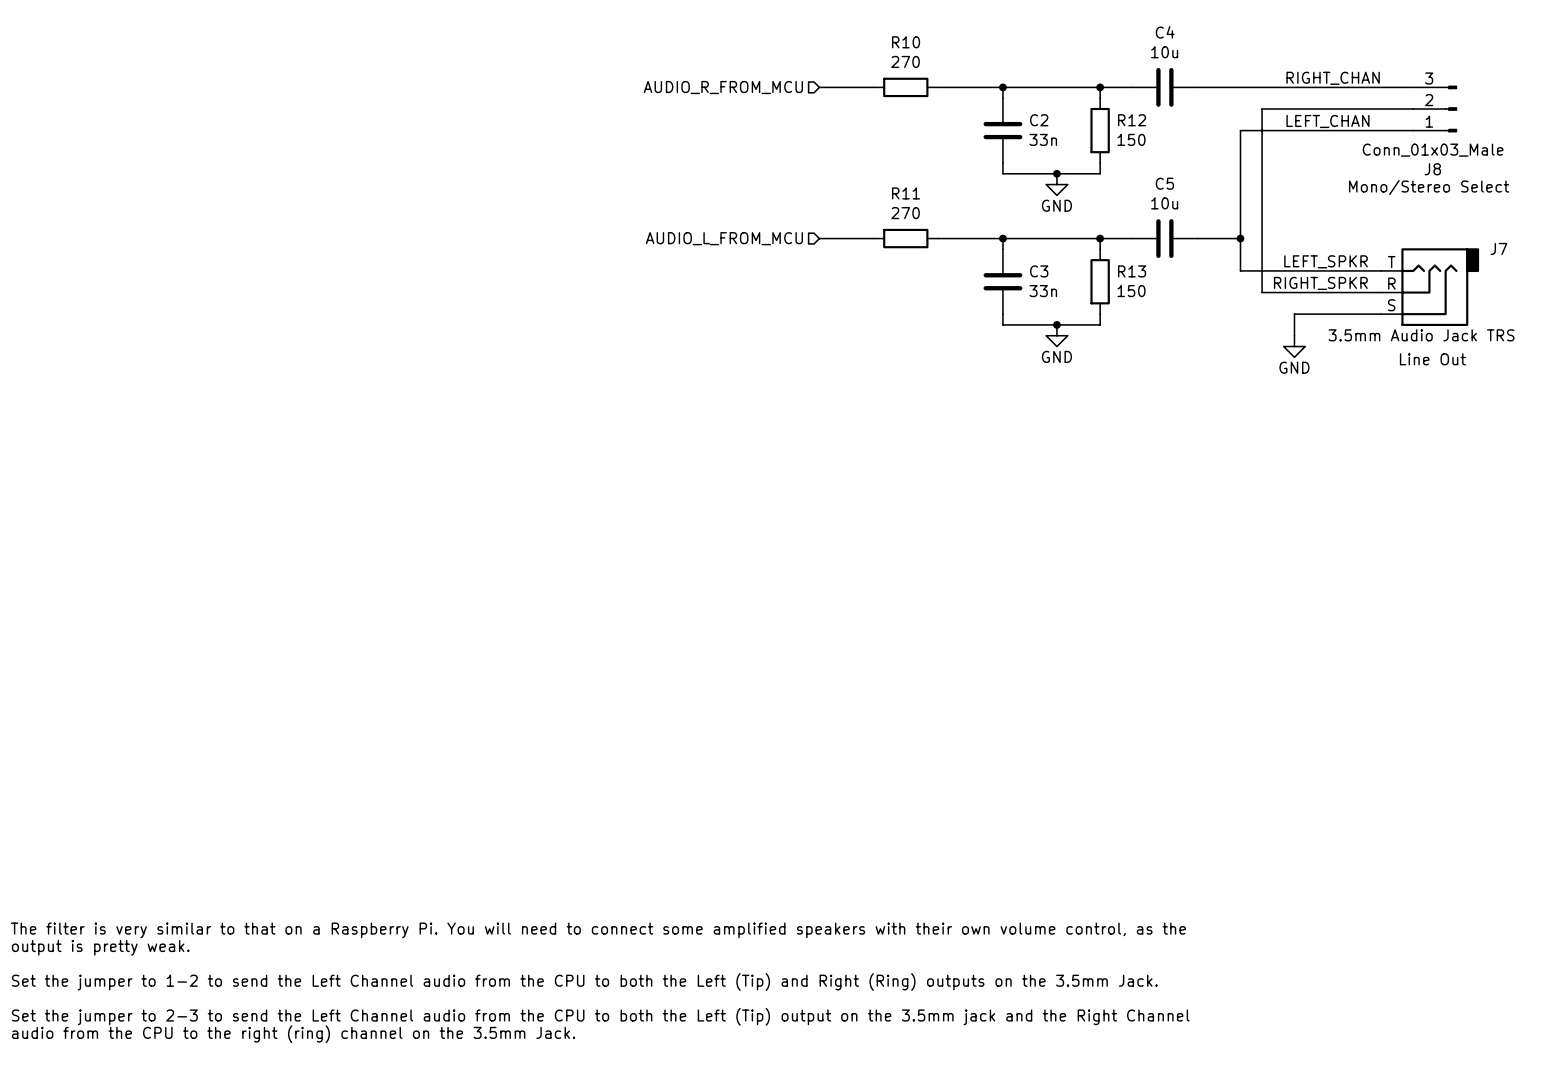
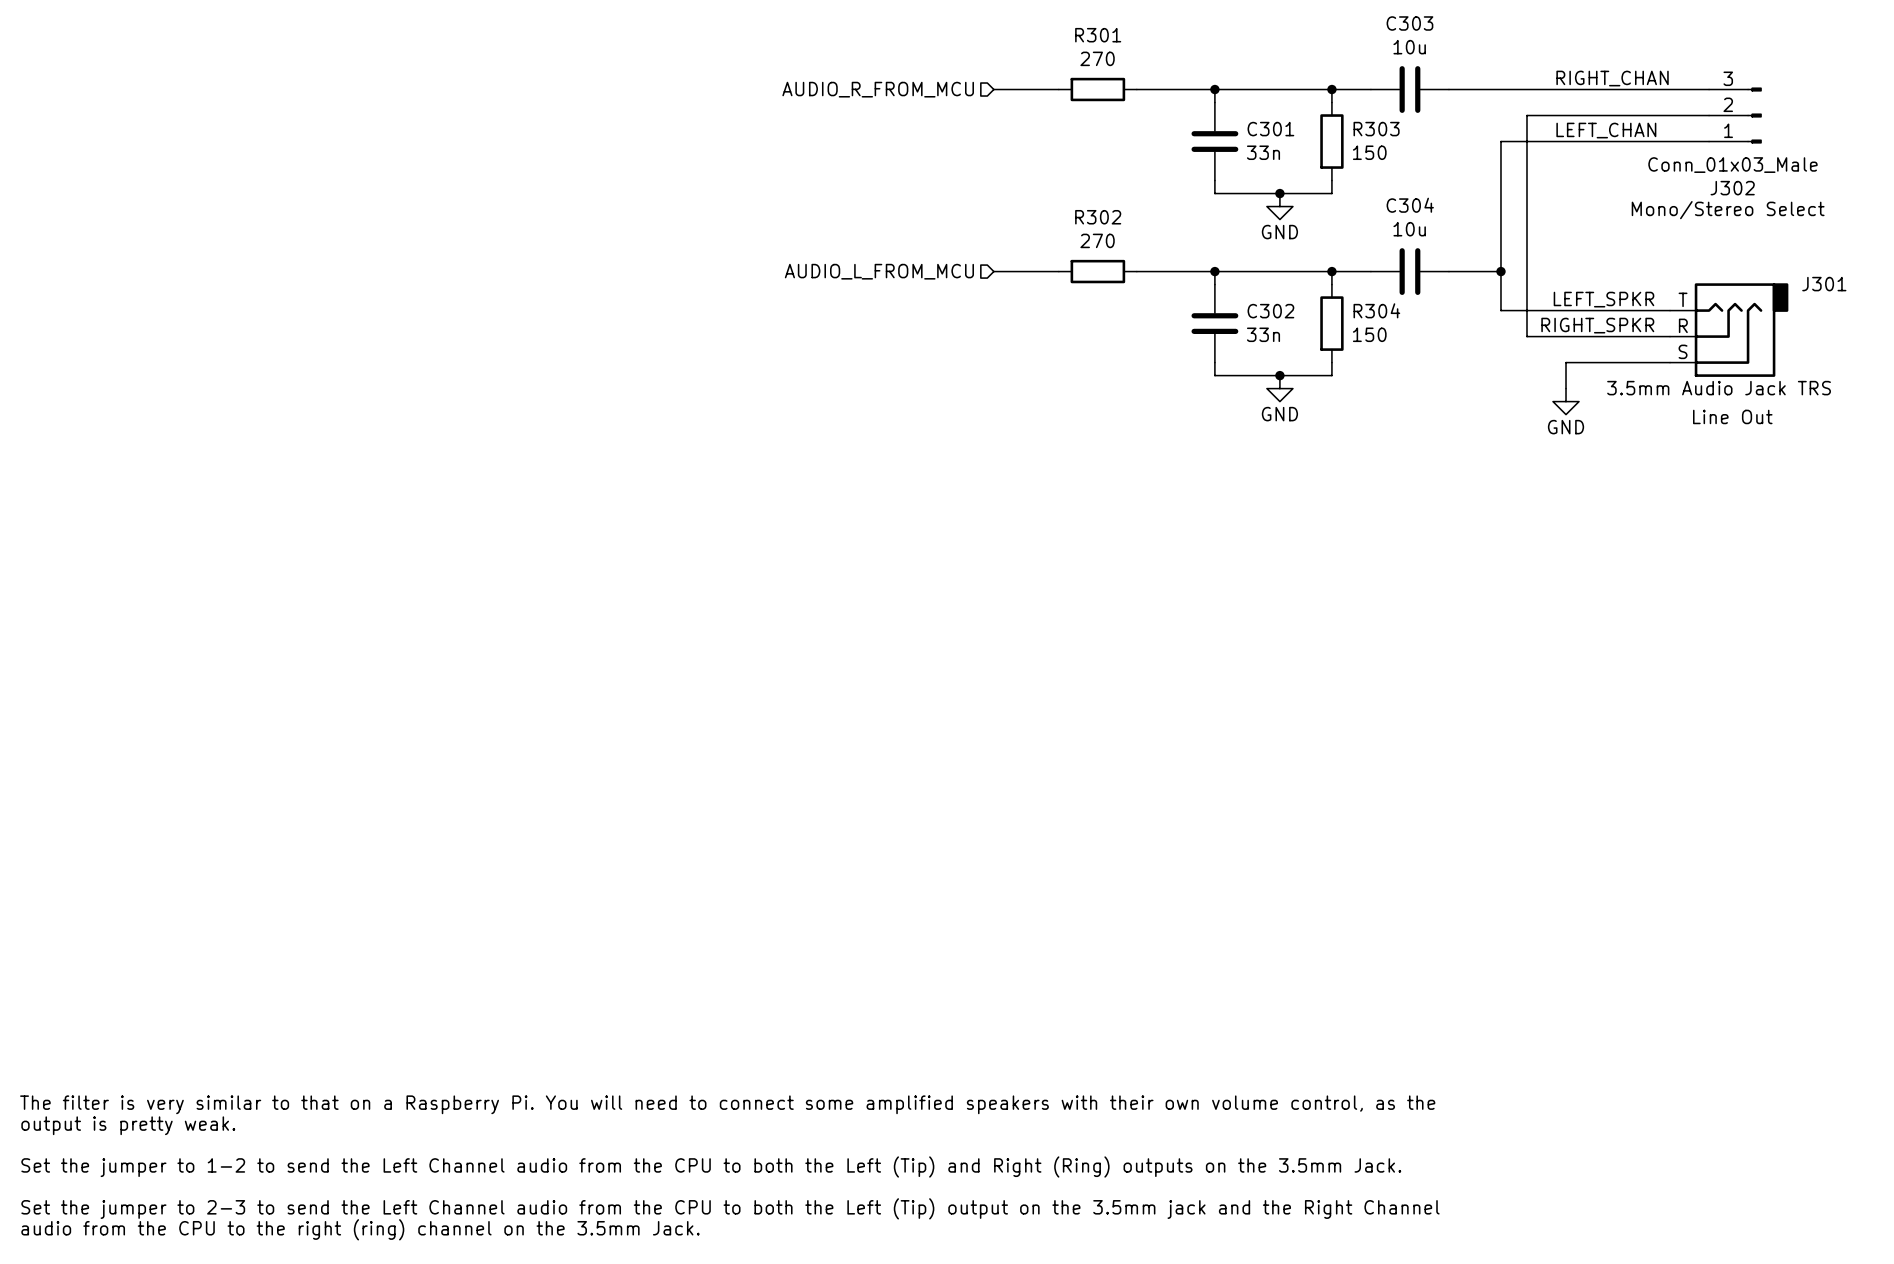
C4 name: C4 (1165, 32) -> C303 (1409, 23)
R10 name: R10 (906, 42) -> R301 (1098, 35)
C2 name: C2 (1039, 120) -> C301 (1270, 129)
R12 name: R12 (1132, 120) -> R303 (1376, 129)
J8 name: J8 (1432, 169) -> J302 (1732, 188)
C5 name: C5 (1164, 183) -> C304 (1410, 205)
R11 name: R11 (906, 193) -> R302 (1098, 217)
J7 name: J7 (1498, 248) -> J301 (1824, 284)
C3 name: C3 (1039, 271) -> C302 (1270, 311)
R13 name: R13 (1132, 271) -> R304 (1376, 310)

